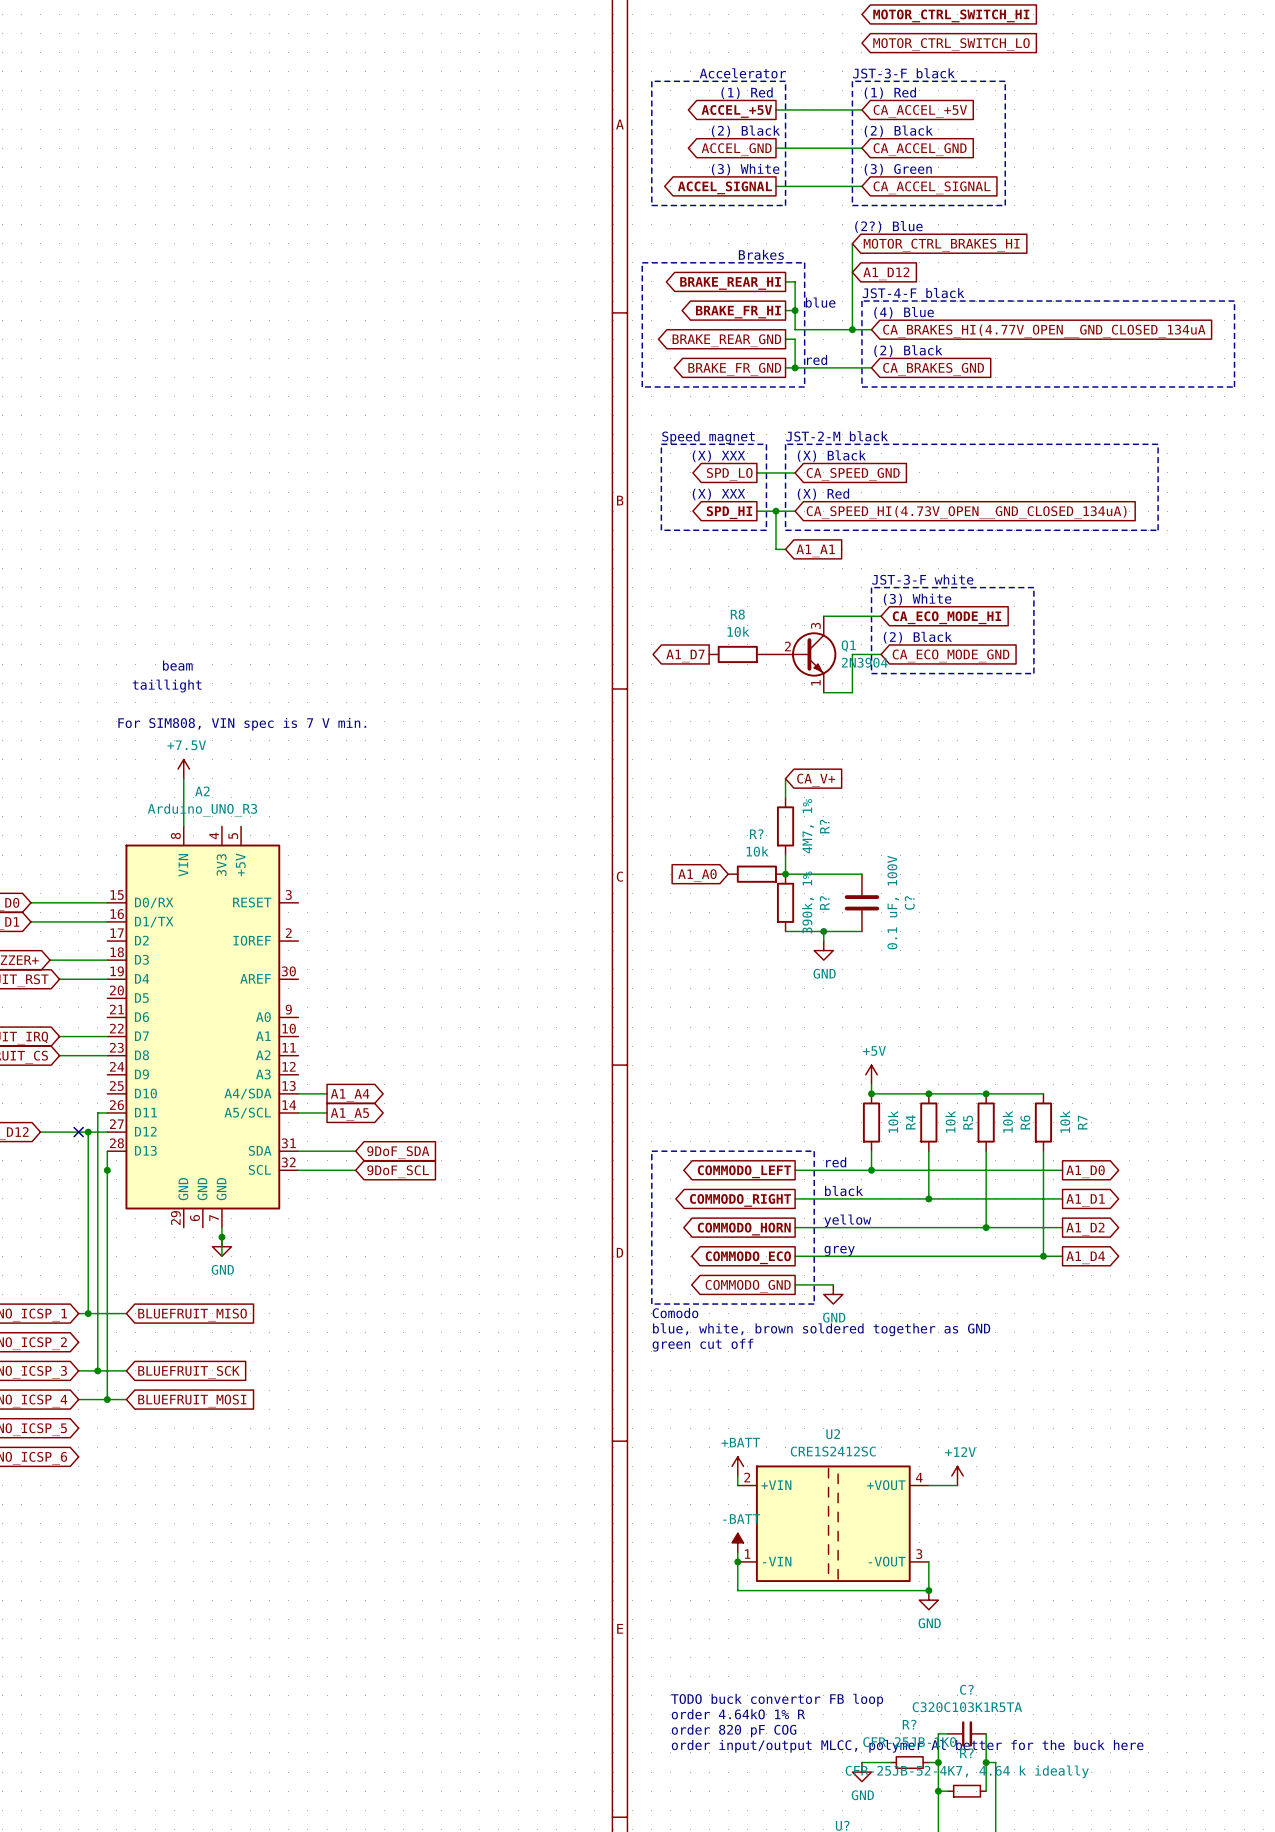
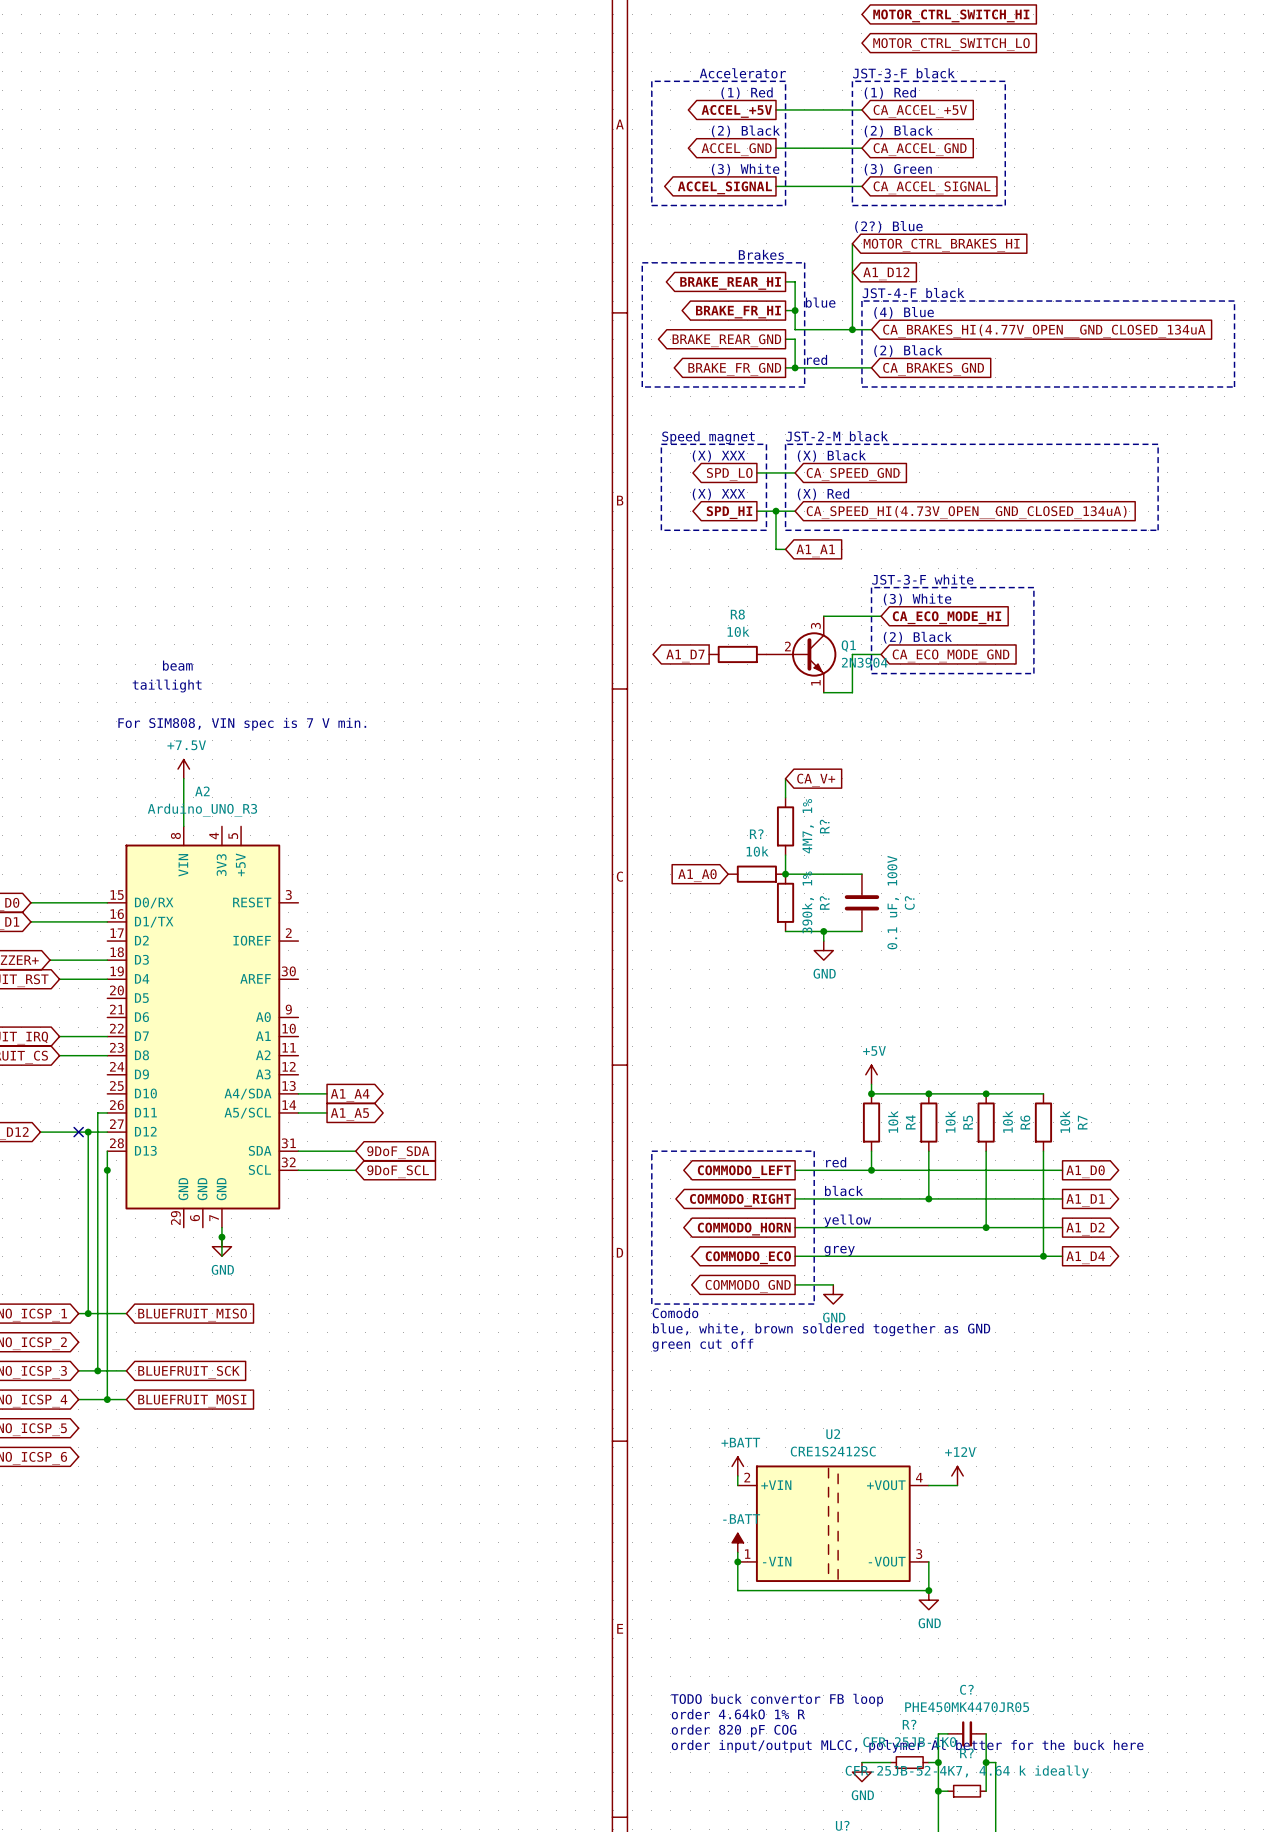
C? value: C320C103K1R5TA (967, 1707) -> PHE450MK4470JR05 (967, 1707)

